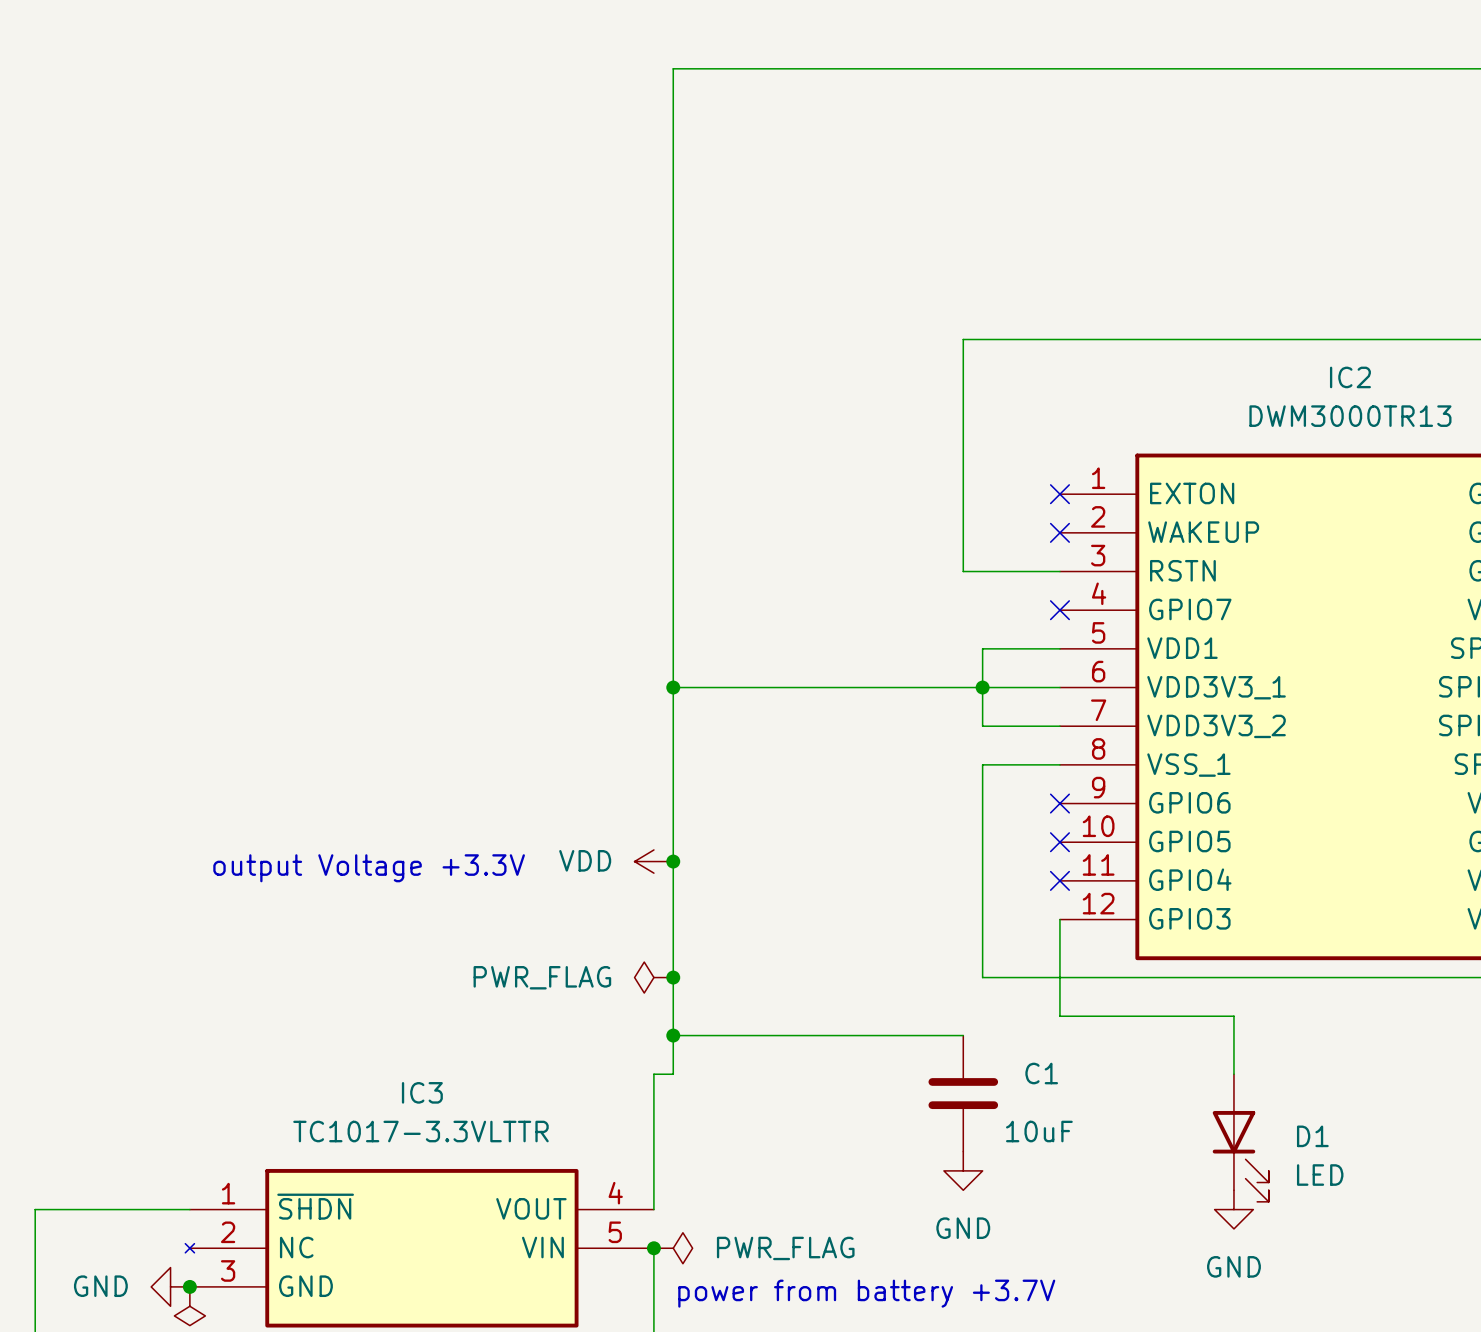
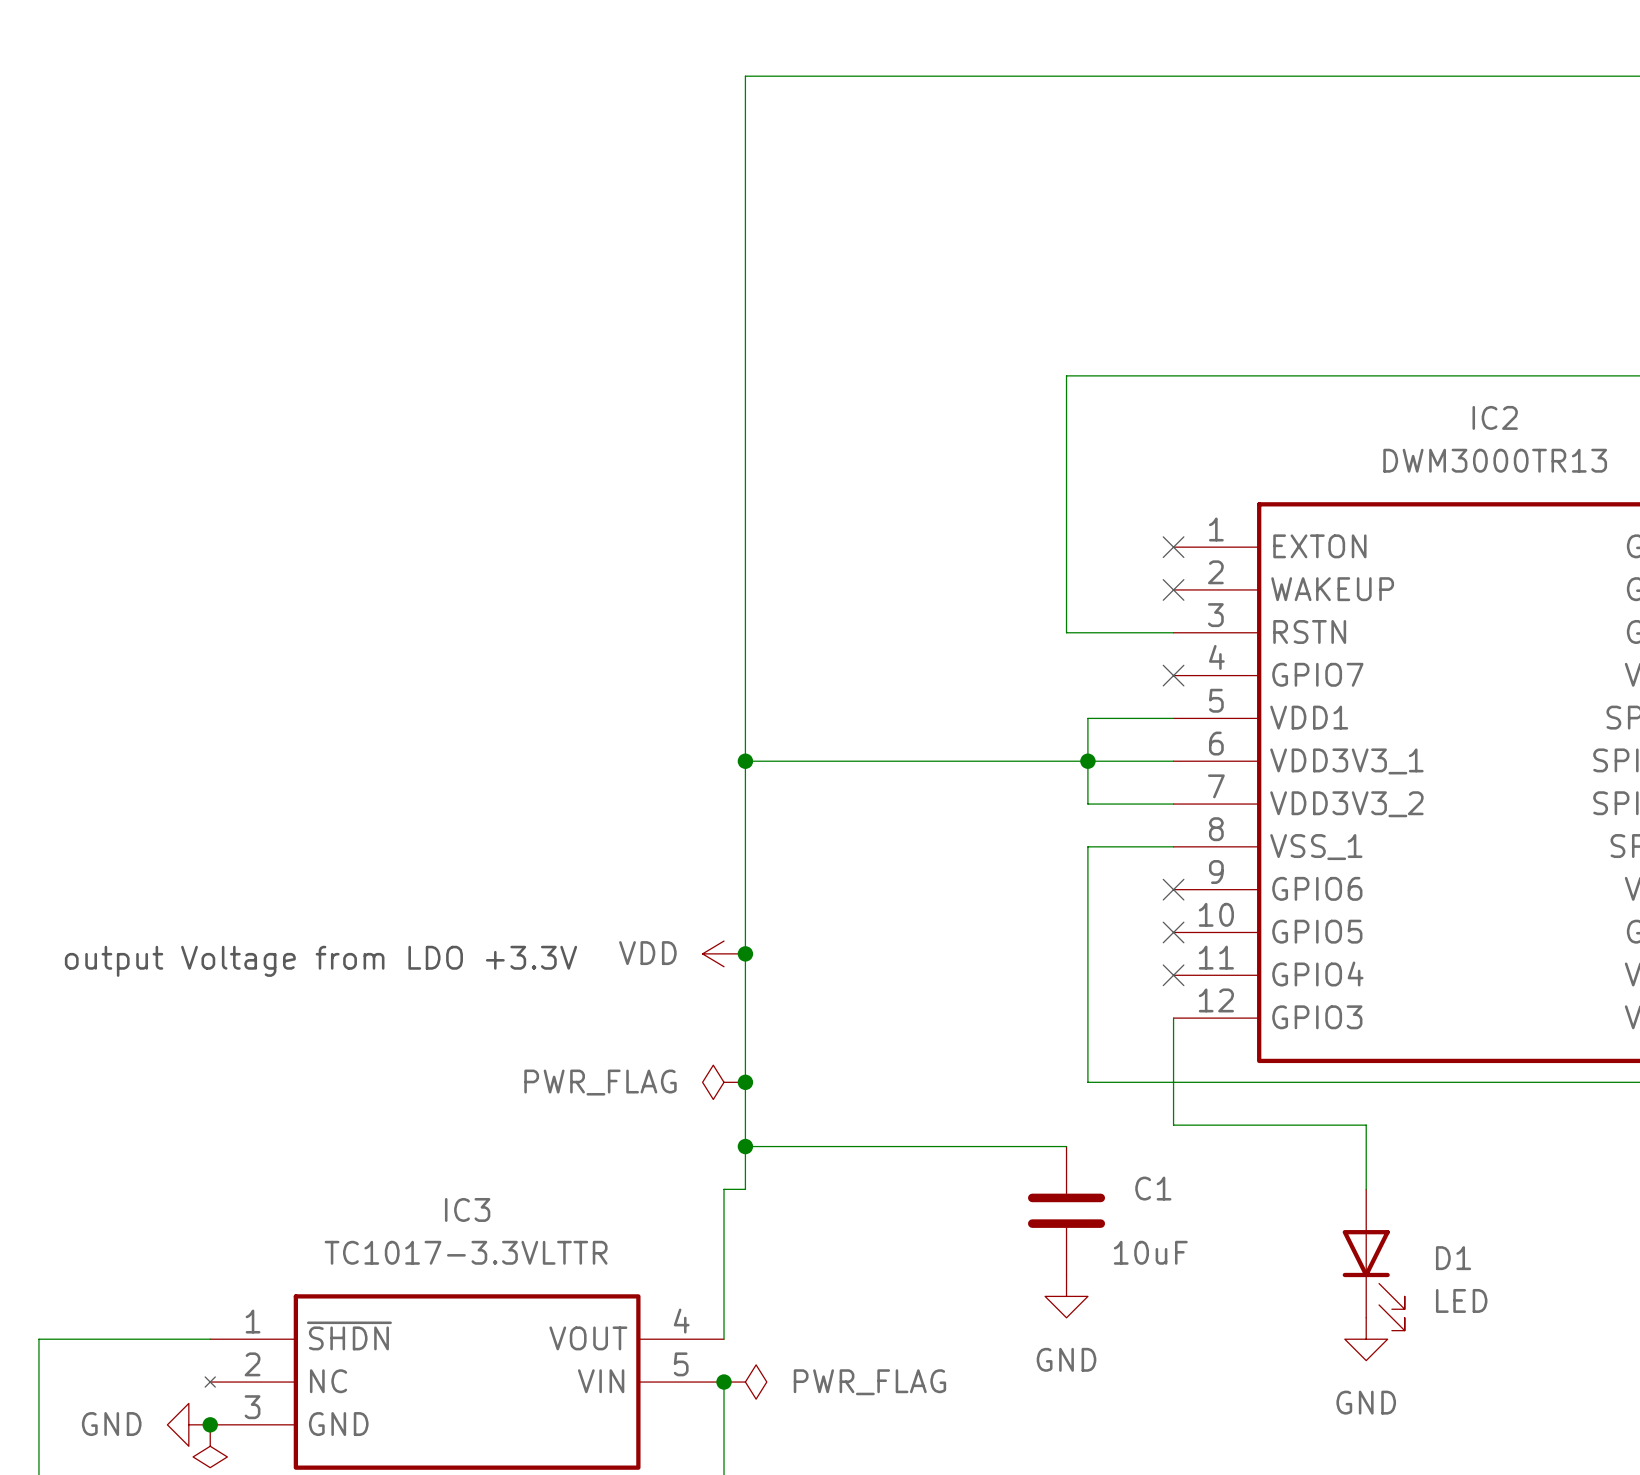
text: output Voltage +3.3V (369, 868) -> output Voltage from LDO +3.3V (321, 961)
text: power from battery +3.7V (866, 1293) -> none

